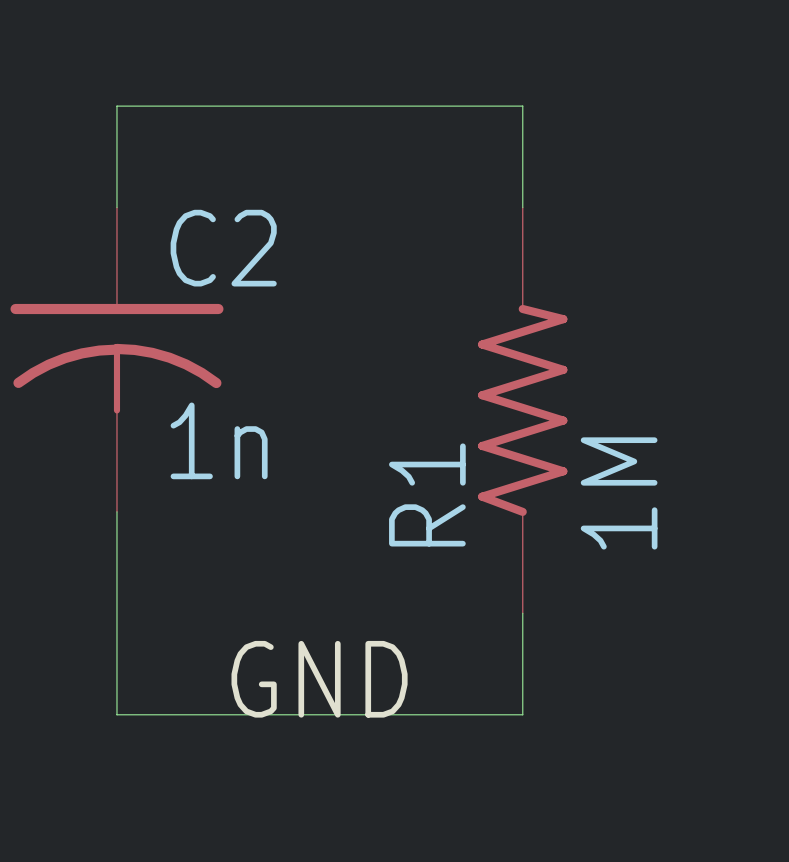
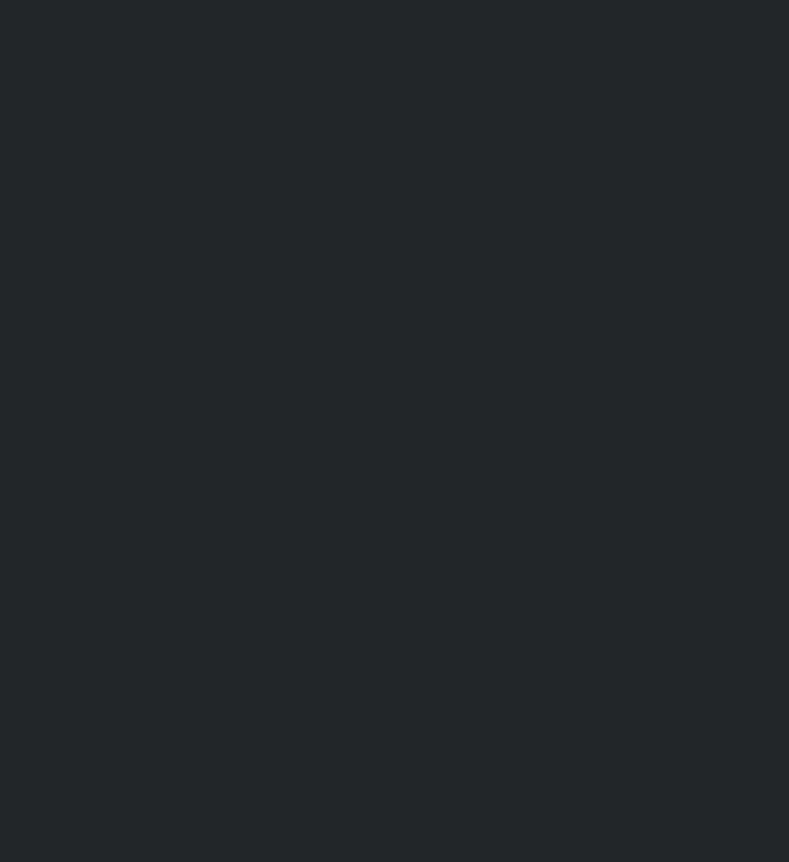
wire: (116, 207) (116, 106) (522, 106) (522, 207) -> none
C2: 1n (116, 359) -> none
R1: 1M (522, 410) -> none
wire: (116, 511) (116, 714) (522, 714) (522, 613) -> none
label: GND (319, 679) -> none

